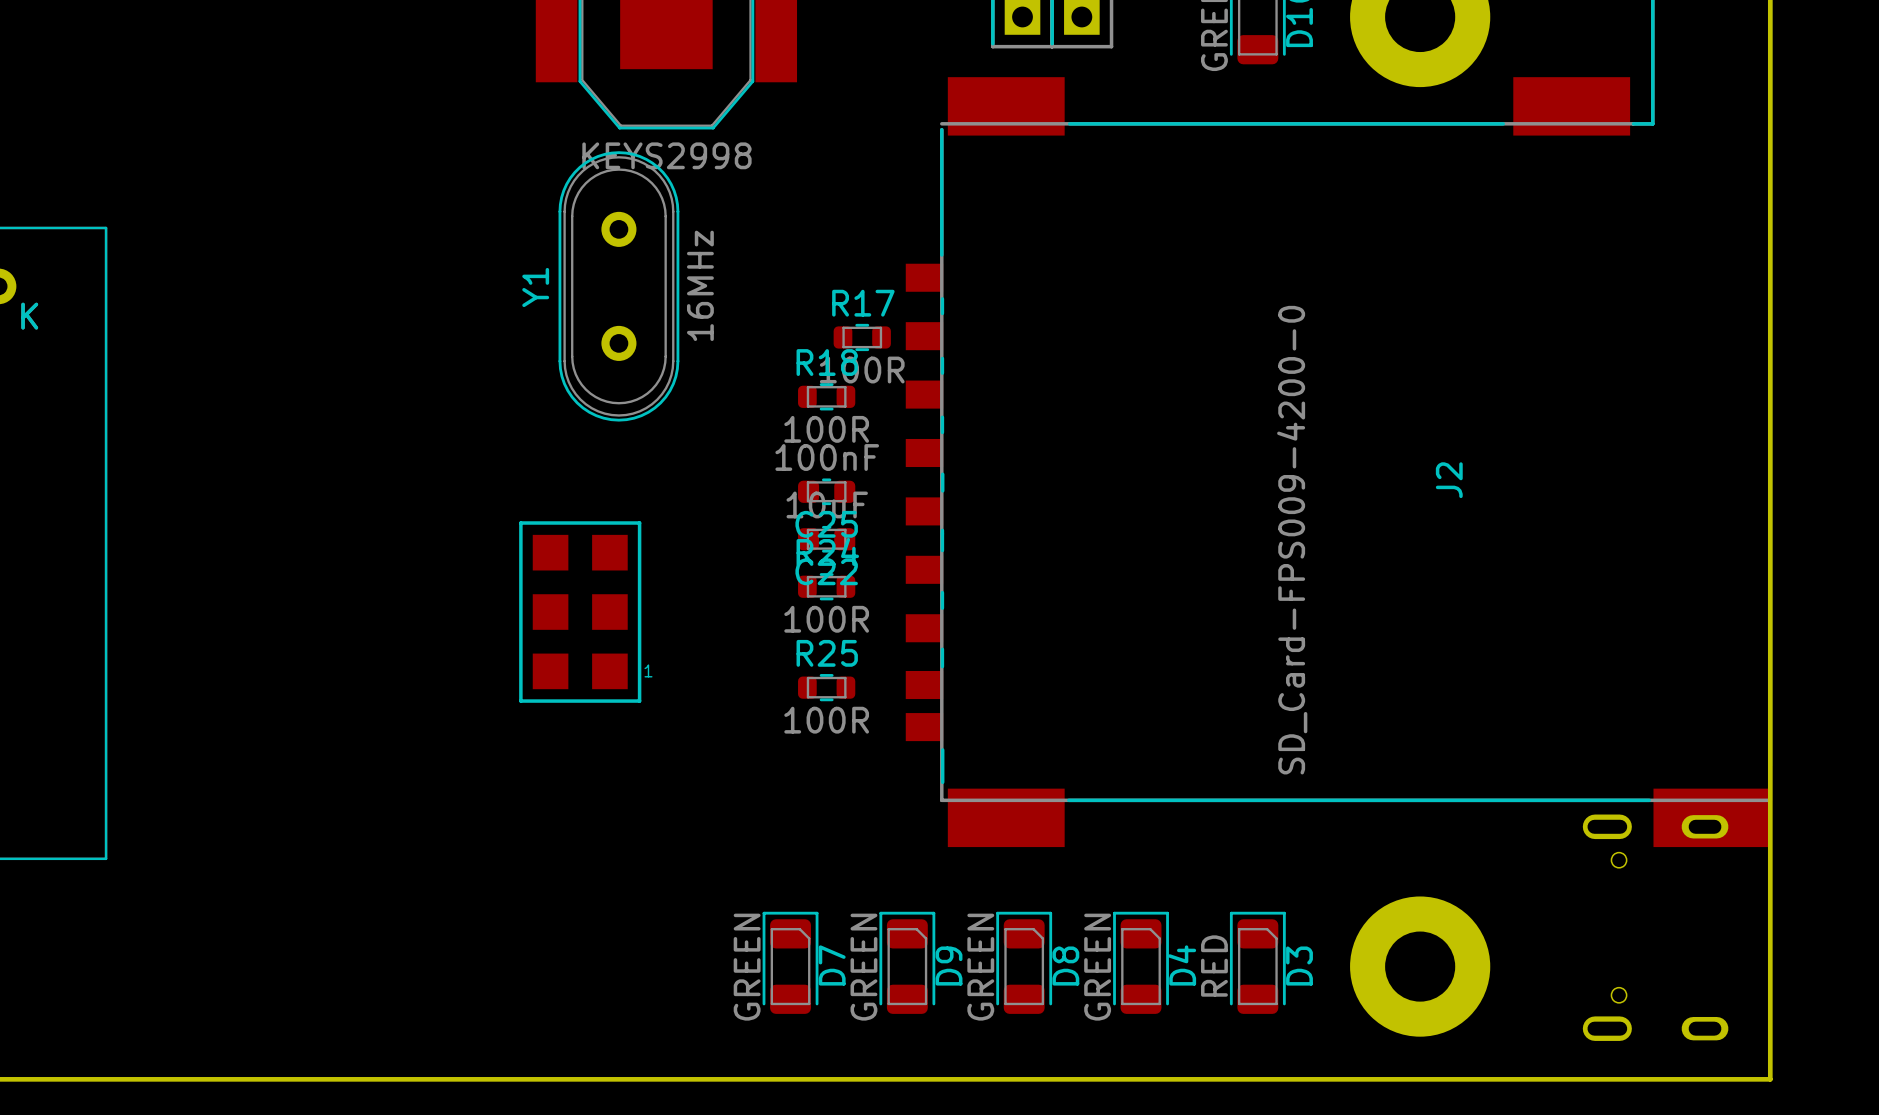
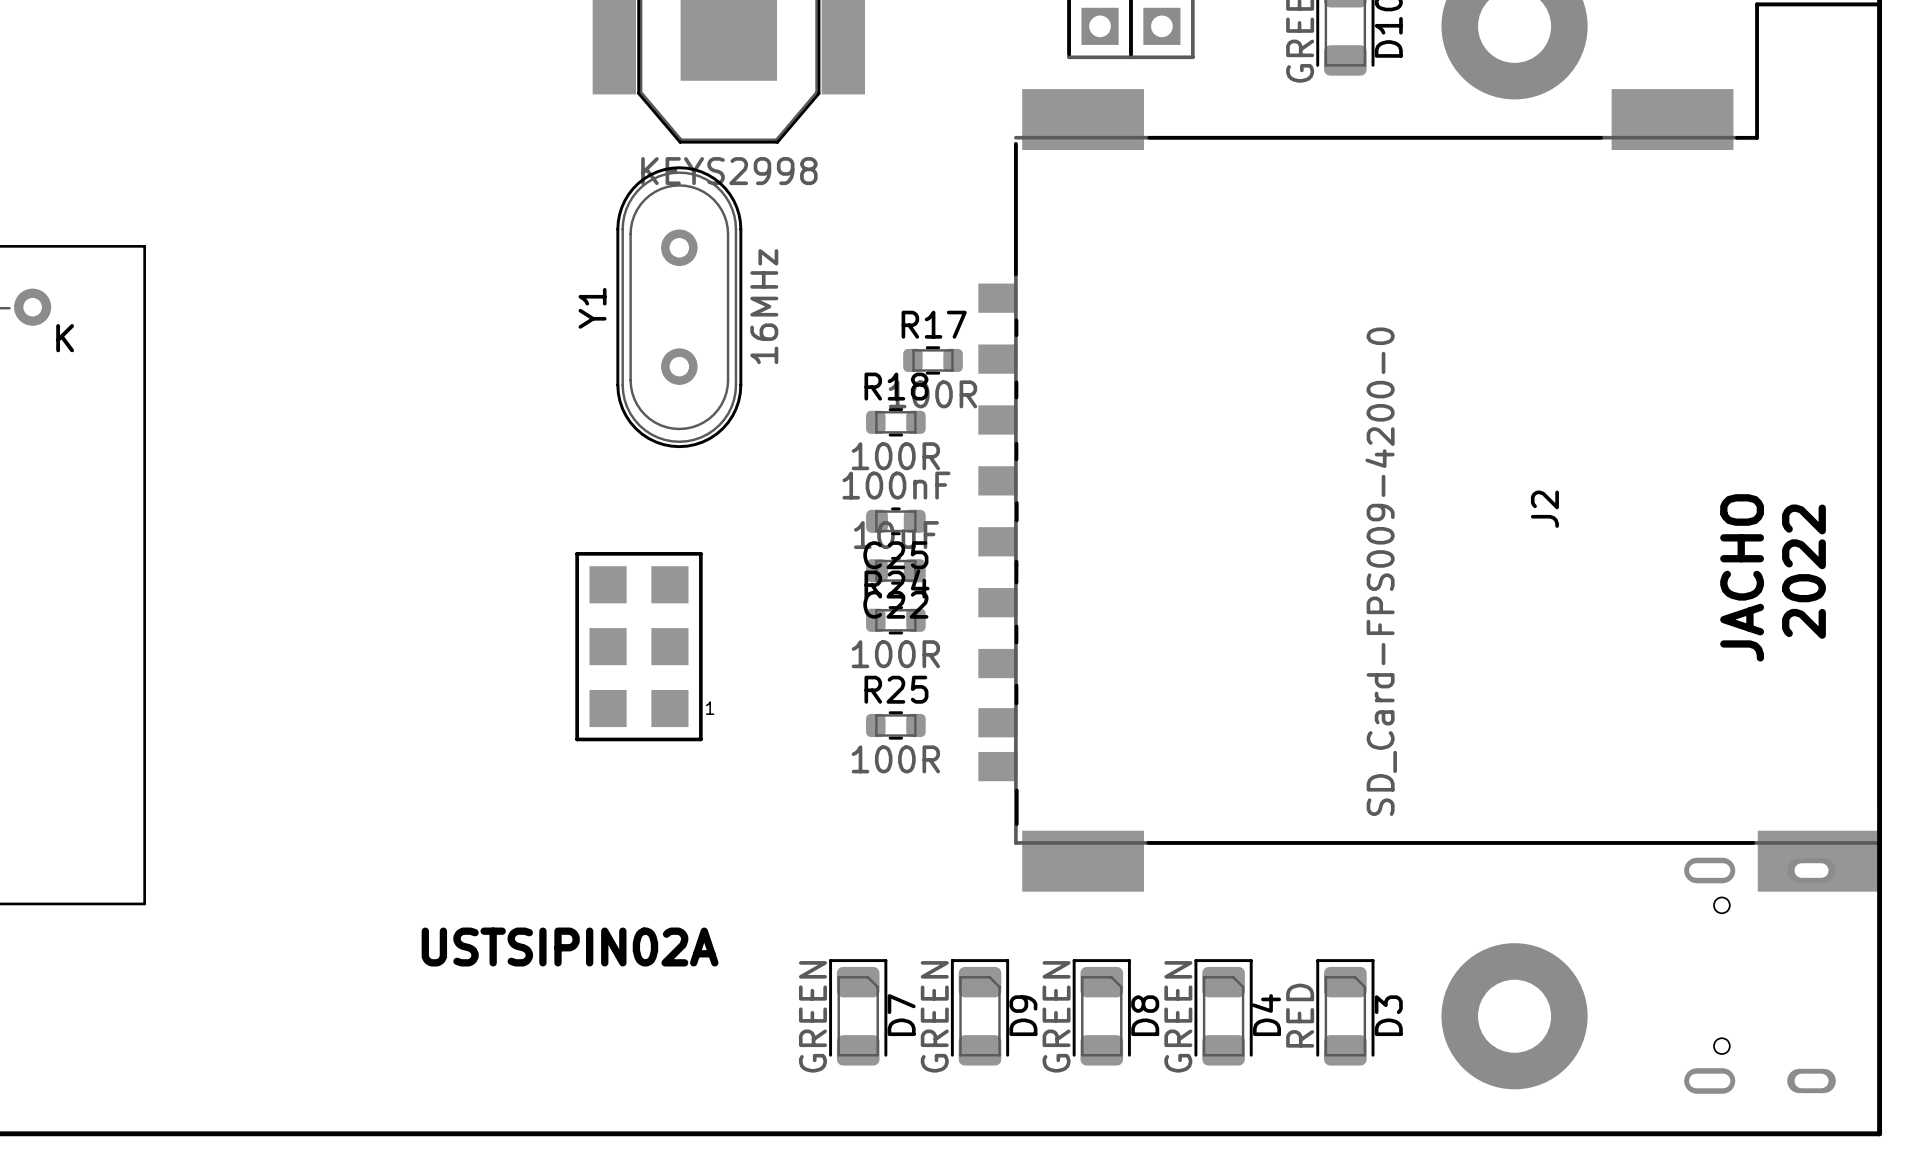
text: none -> 2022 (1803, 571)
text: none -> JACHO (1742, 577)
text: none -> USTSIPIN02A (570, 947)

